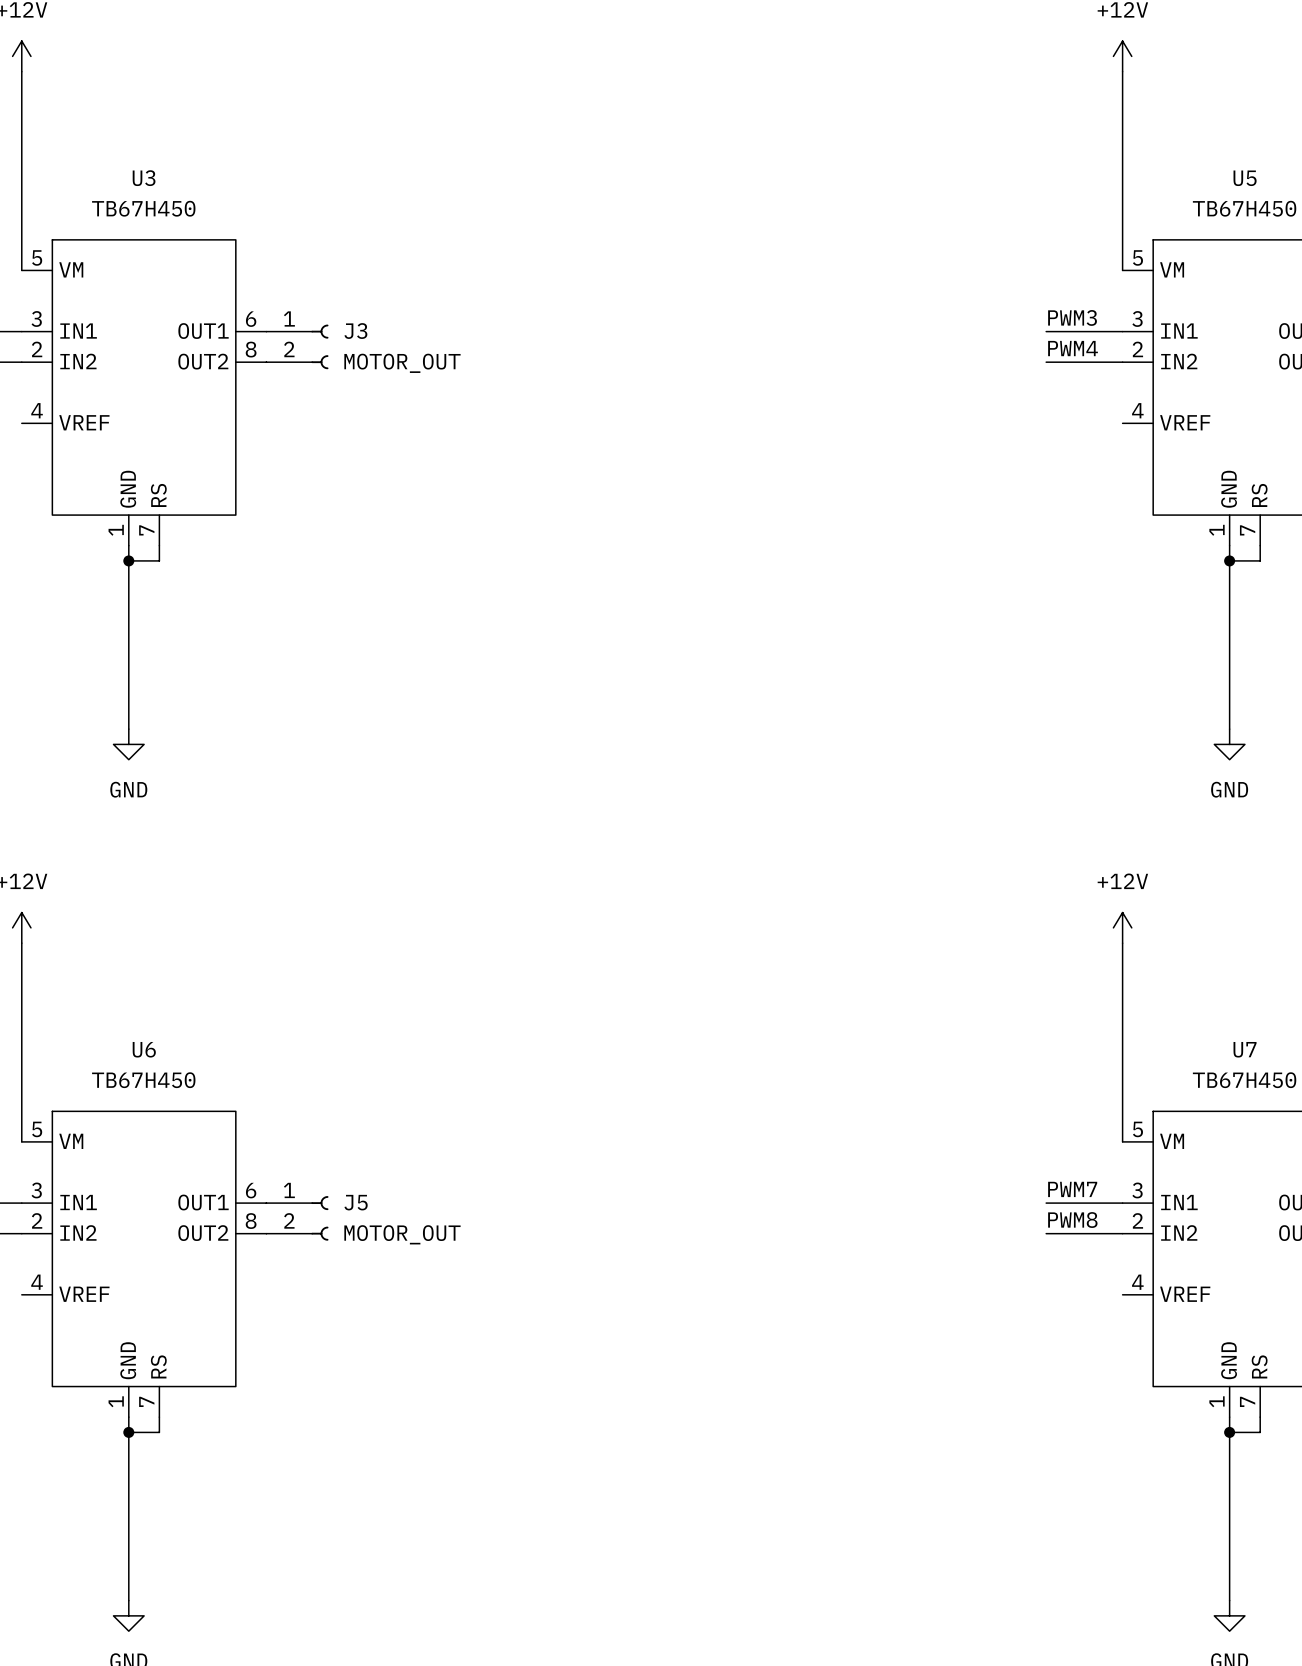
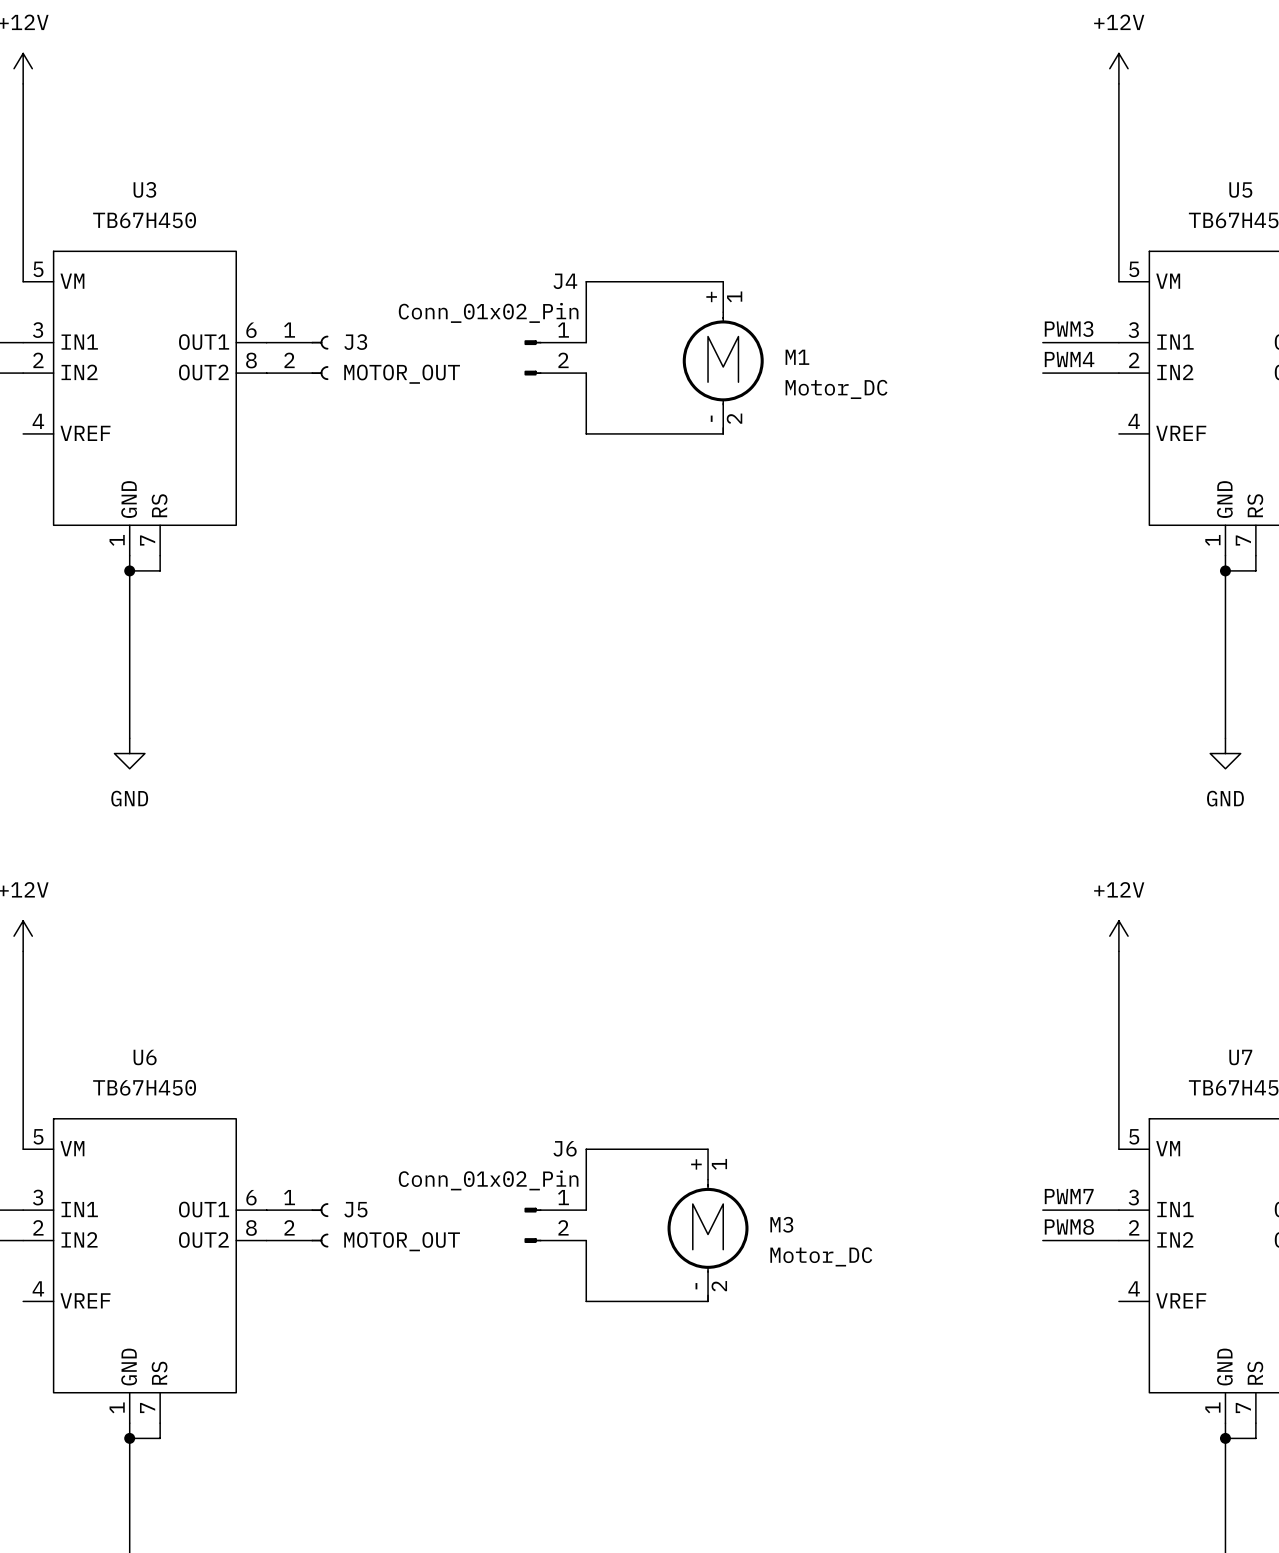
wire: none -> (723, 281) (586, 281) (586, 342)
J4: none -> Conn_01x02_Pin (555, 357)
M1: none -> Motor_DC (723, 357)
wire: none -> (586, 373) (586, 433) (723, 433)
wire: none -> (708, 1149) (586, 1149) (586, 1210)
J6: none -> Conn_01x02_Pin (555, 1225)
M3: none -> Motor_DC (708, 1225)
wire: none -> (586, 1240) (586, 1301) (708, 1301)

